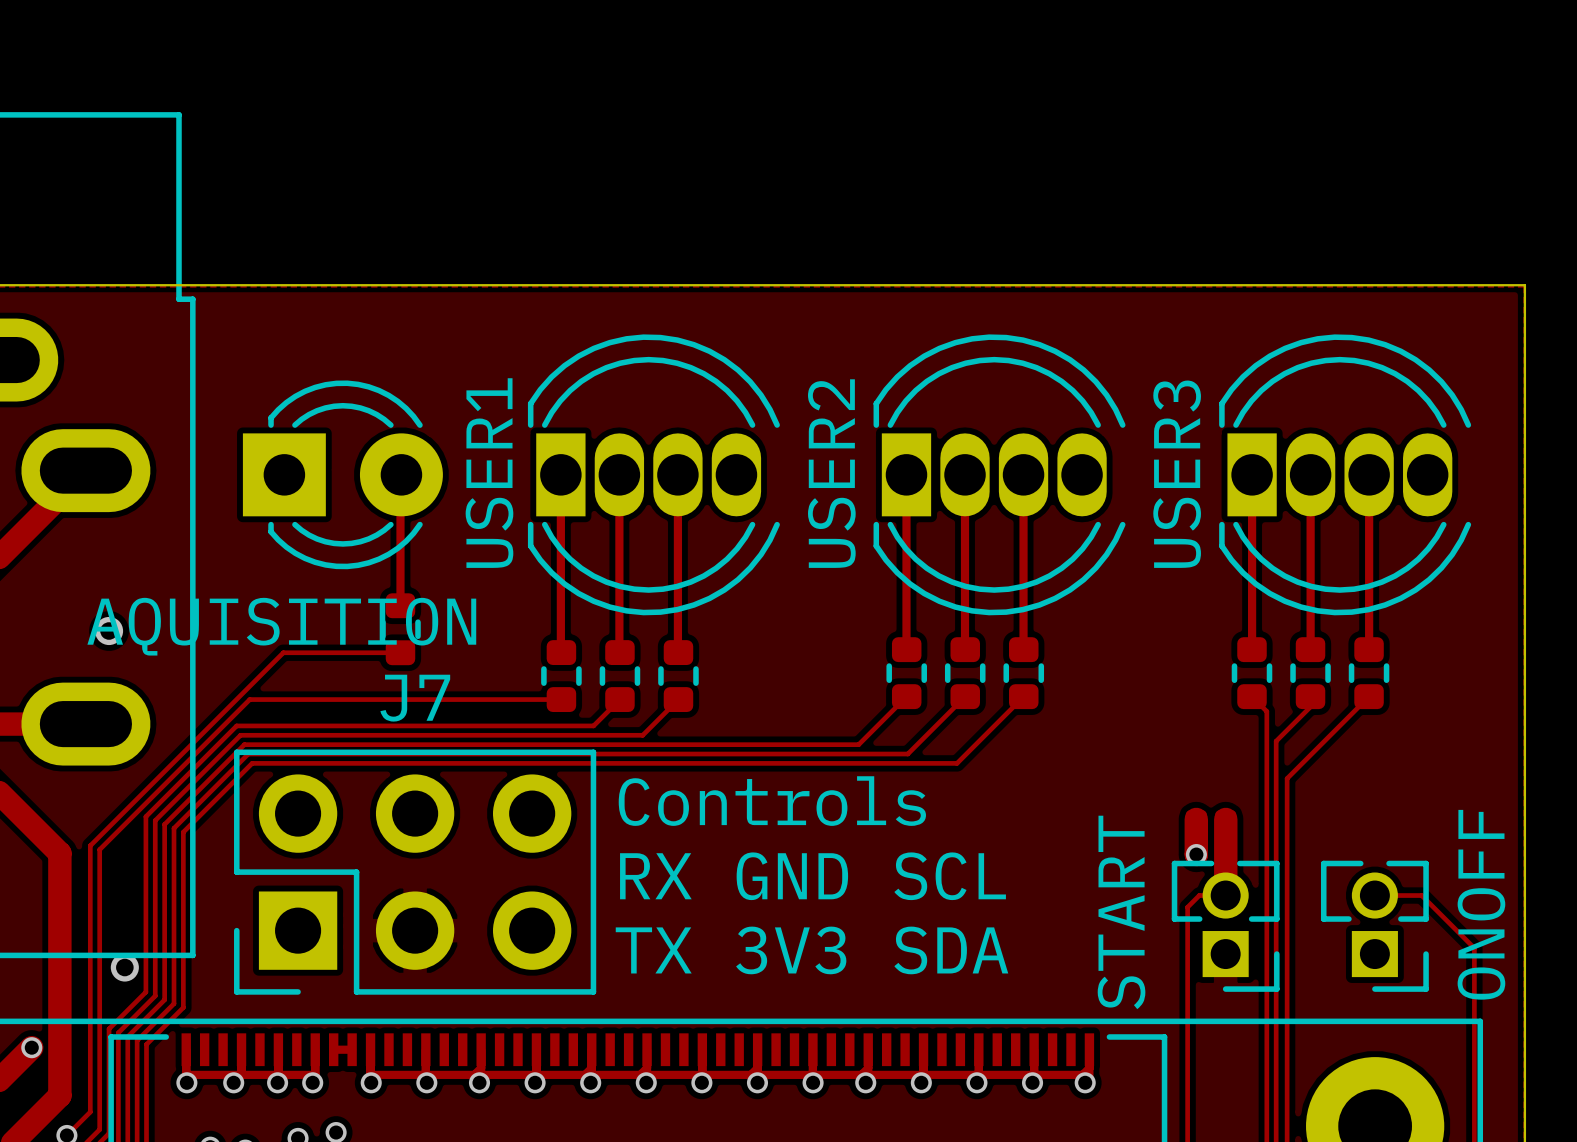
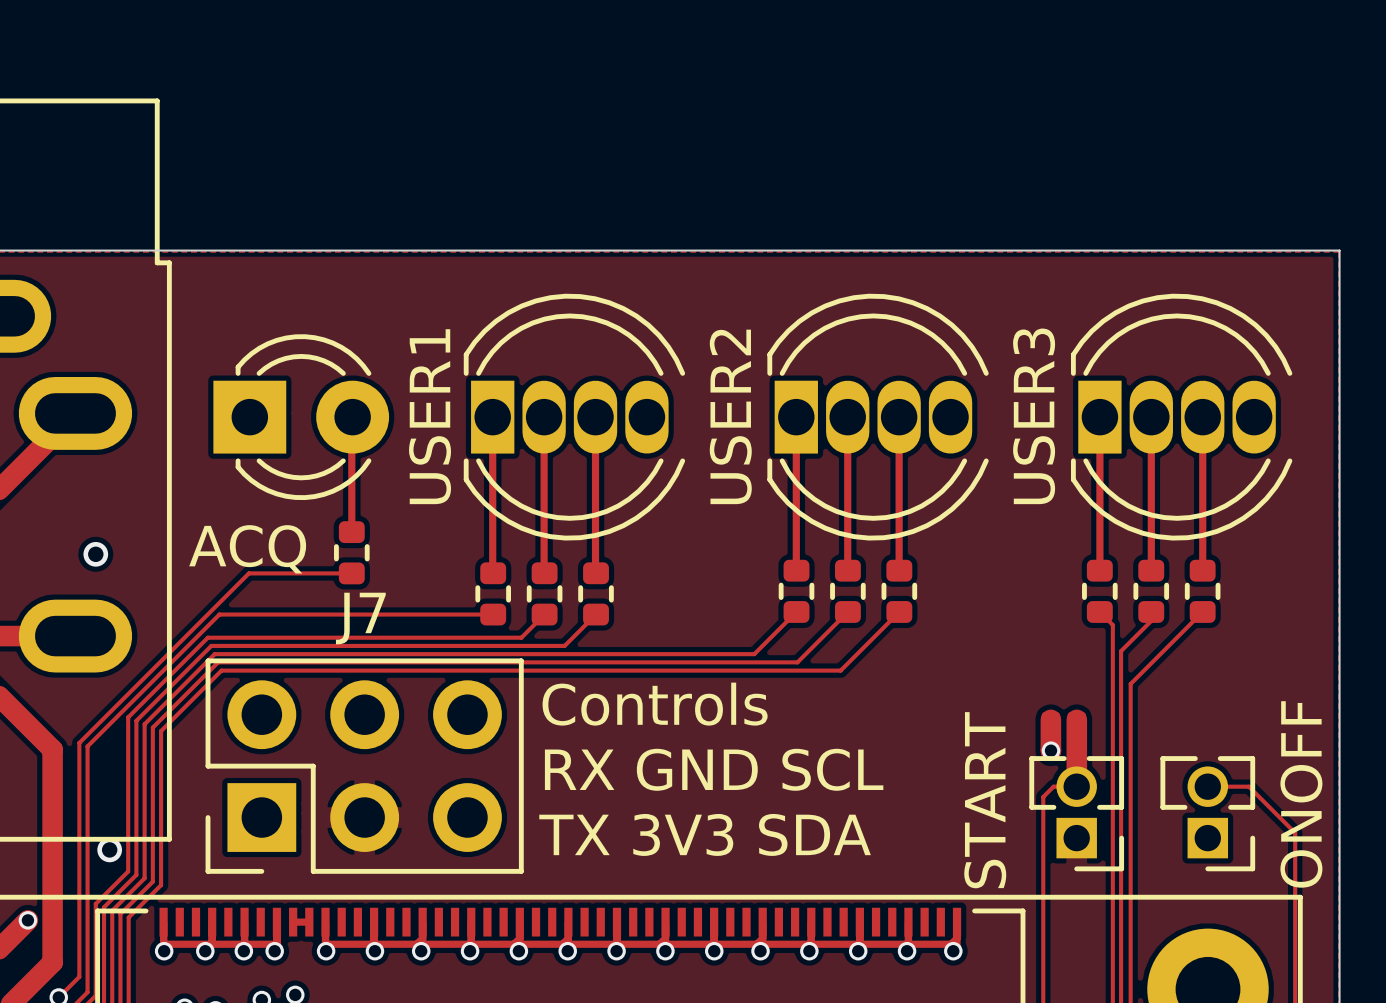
part value: AQUISITION (281, 626) -> ACQ (247, 549)

